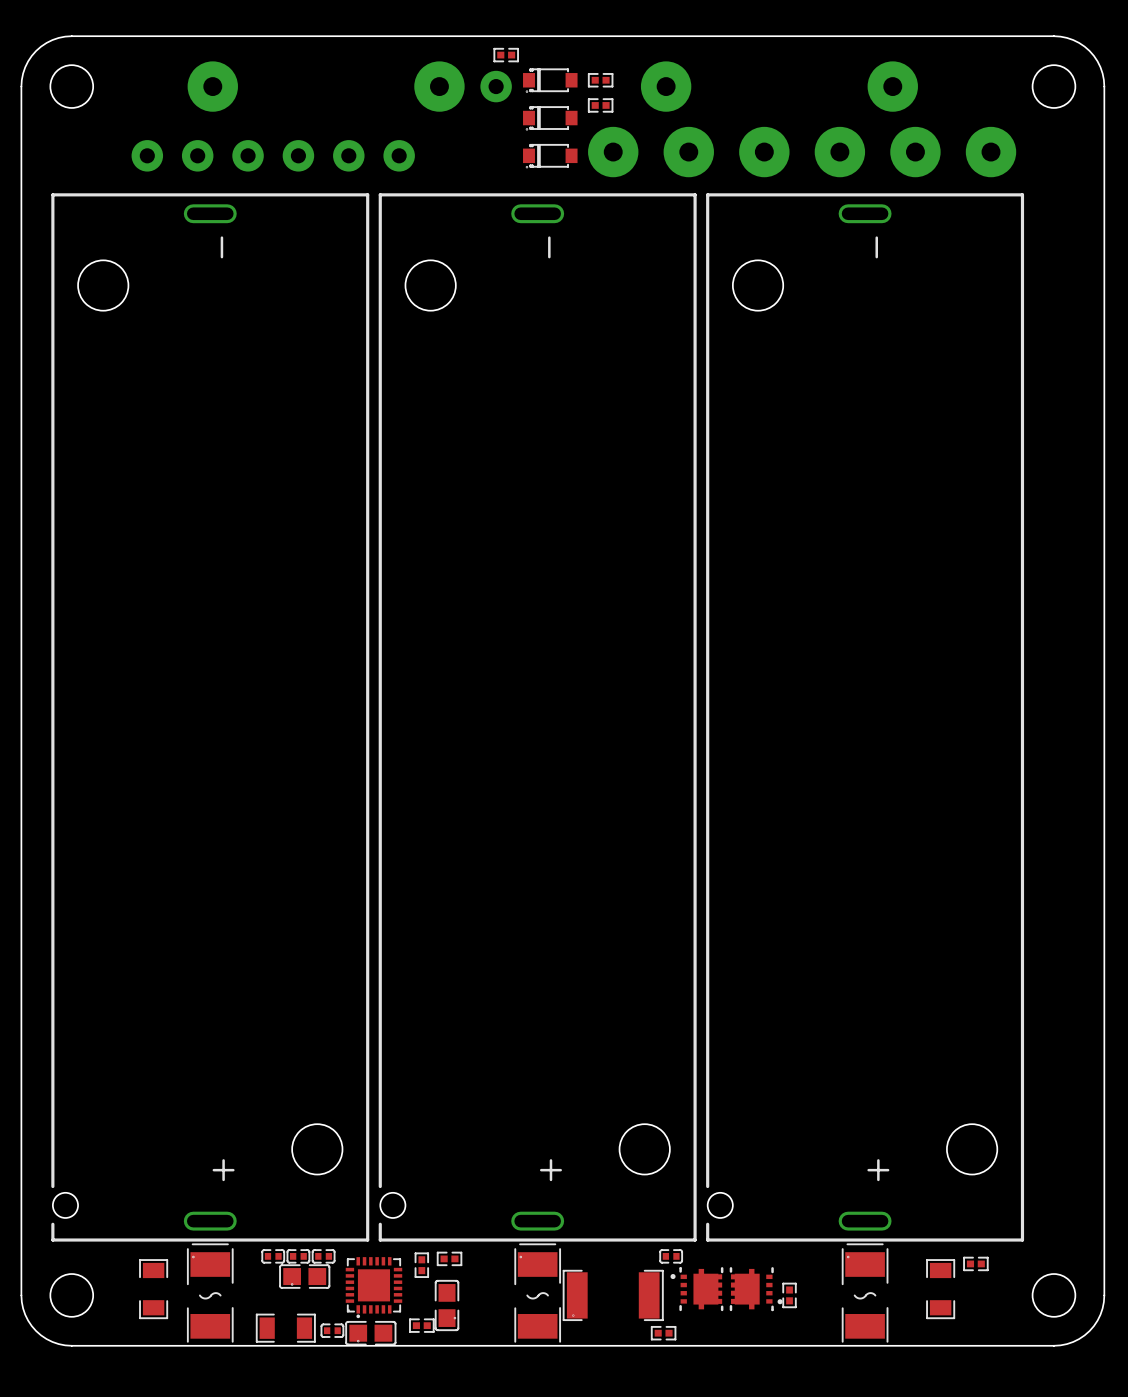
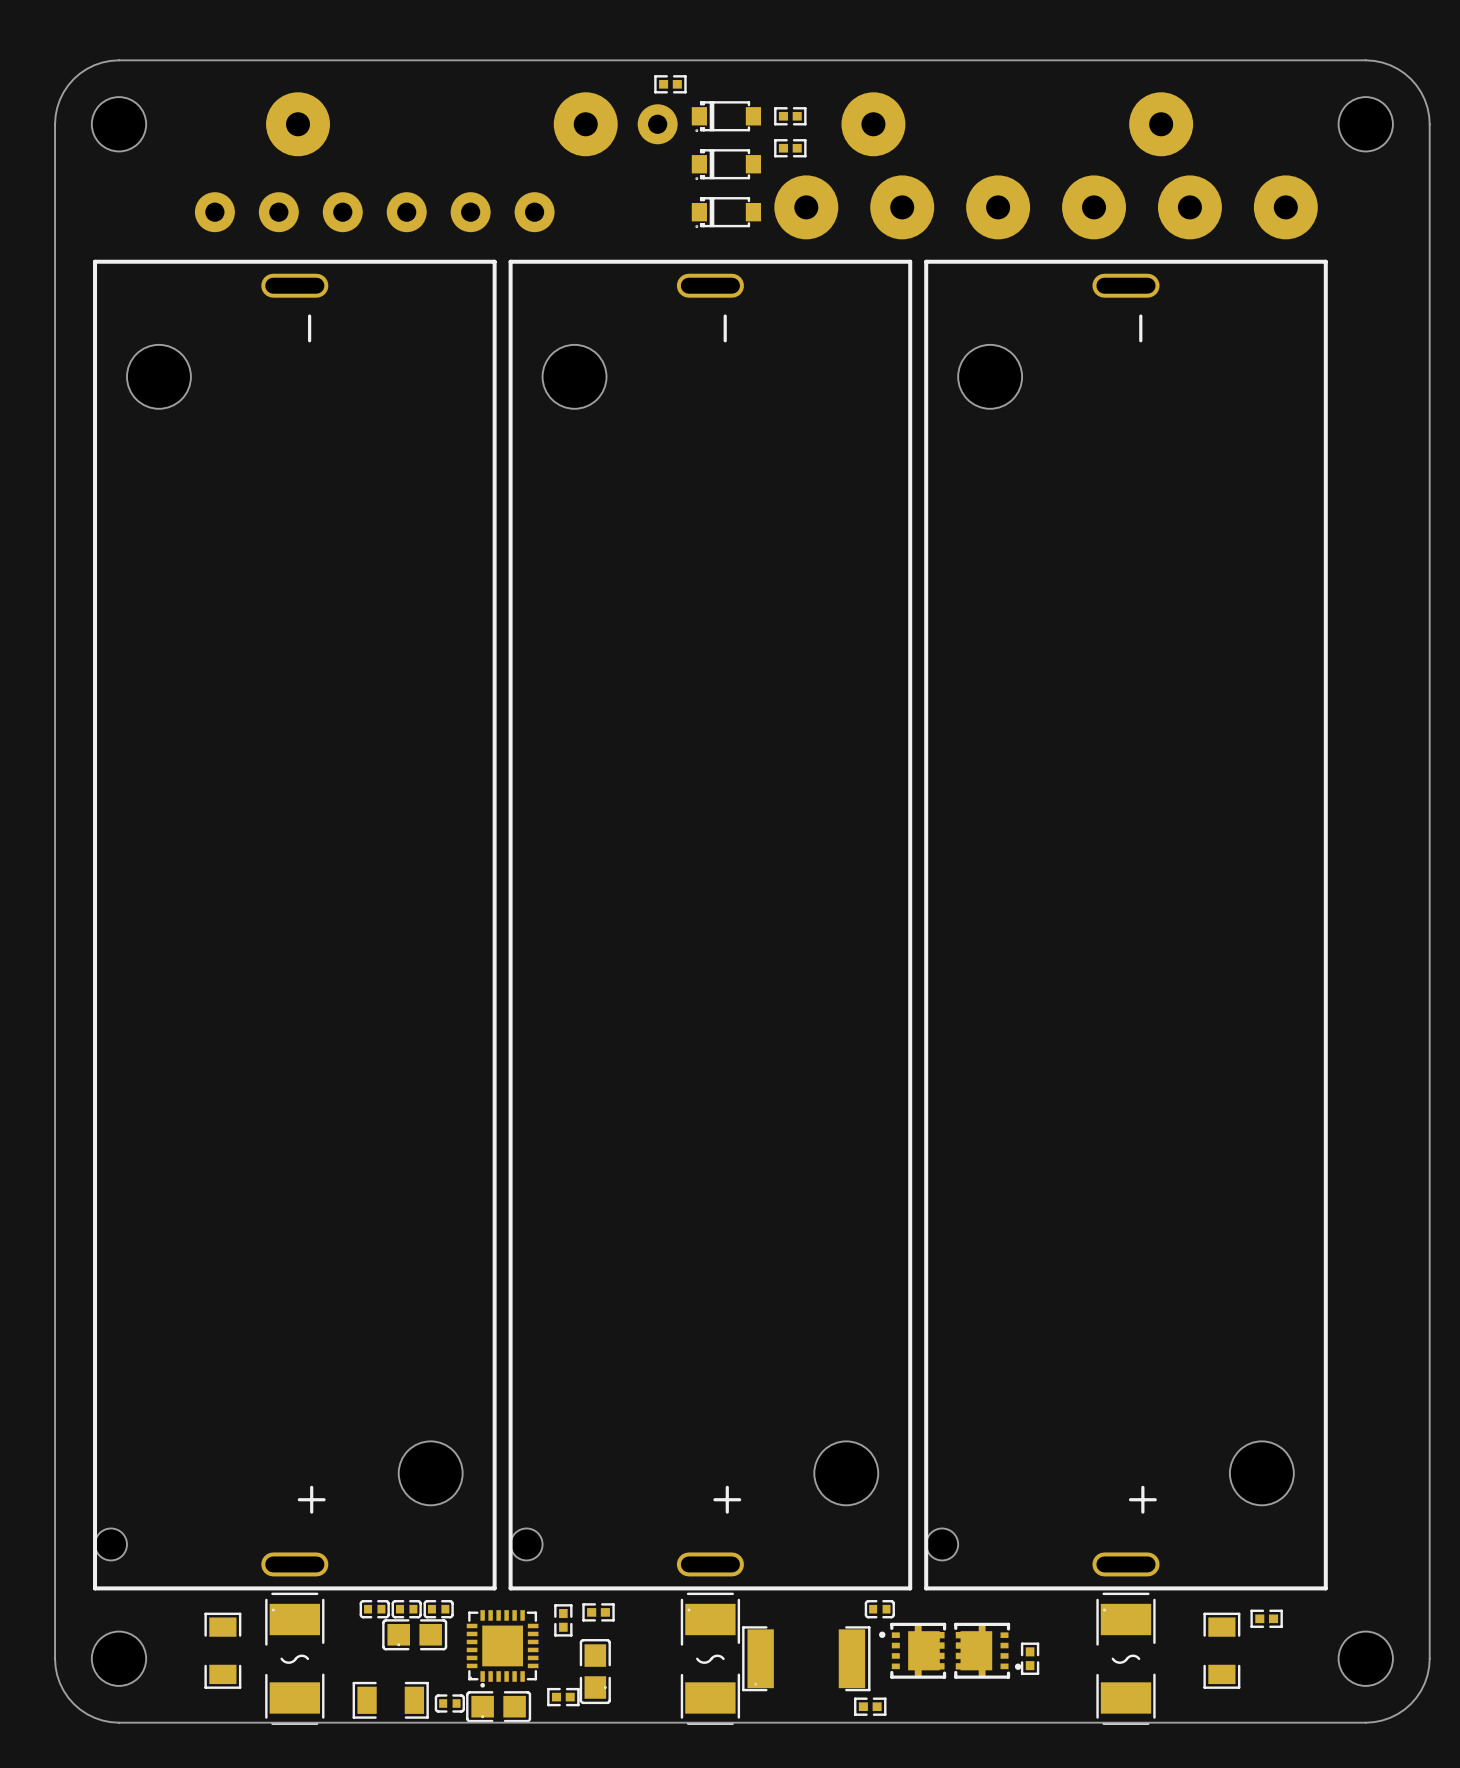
part footprint: [51, 193, 370, 1242] -> [93, 259, 497, 1591]
part footprint: [378, 193, 697, 1242] -> [508, 259, 913, 1591]
part footprint: [706, 193, 1025, 1242] -> [924, 259, 1328, 1591]
part footprint: [186, 1243, 234, 1343] -> [265, 1592, 325, 1725]
part footprint: [514, 1243, 562, 1343] -> [680, 1592, 741, 1725]
part footprint: [841, 1243, 889, 1343] -> [1096, 1592, 1156, 1725]
part footprint: [670, 1267, 724, 1312] -> [879, 1622, 947, 1679]
part footprint: [729, 1267, 783, 1312] -> [954, 1622, 1022, 1679]

